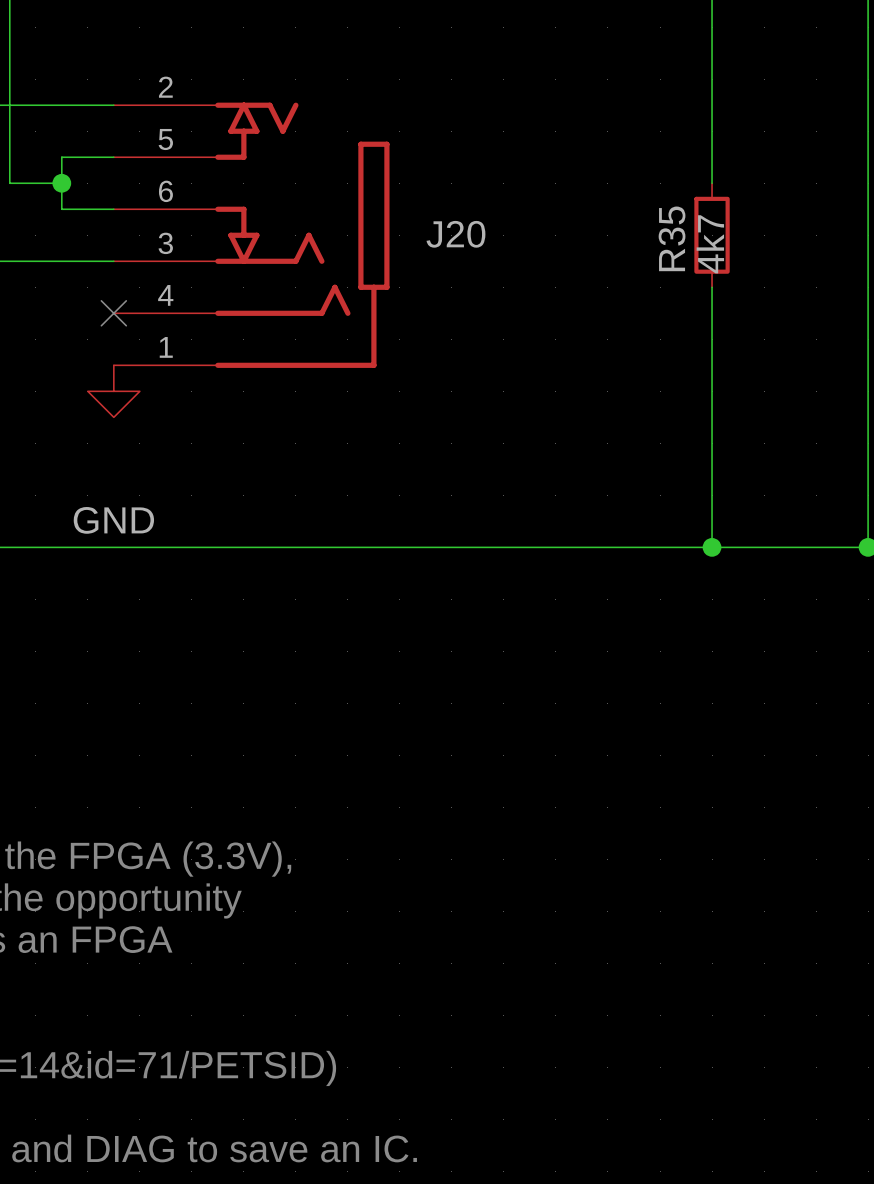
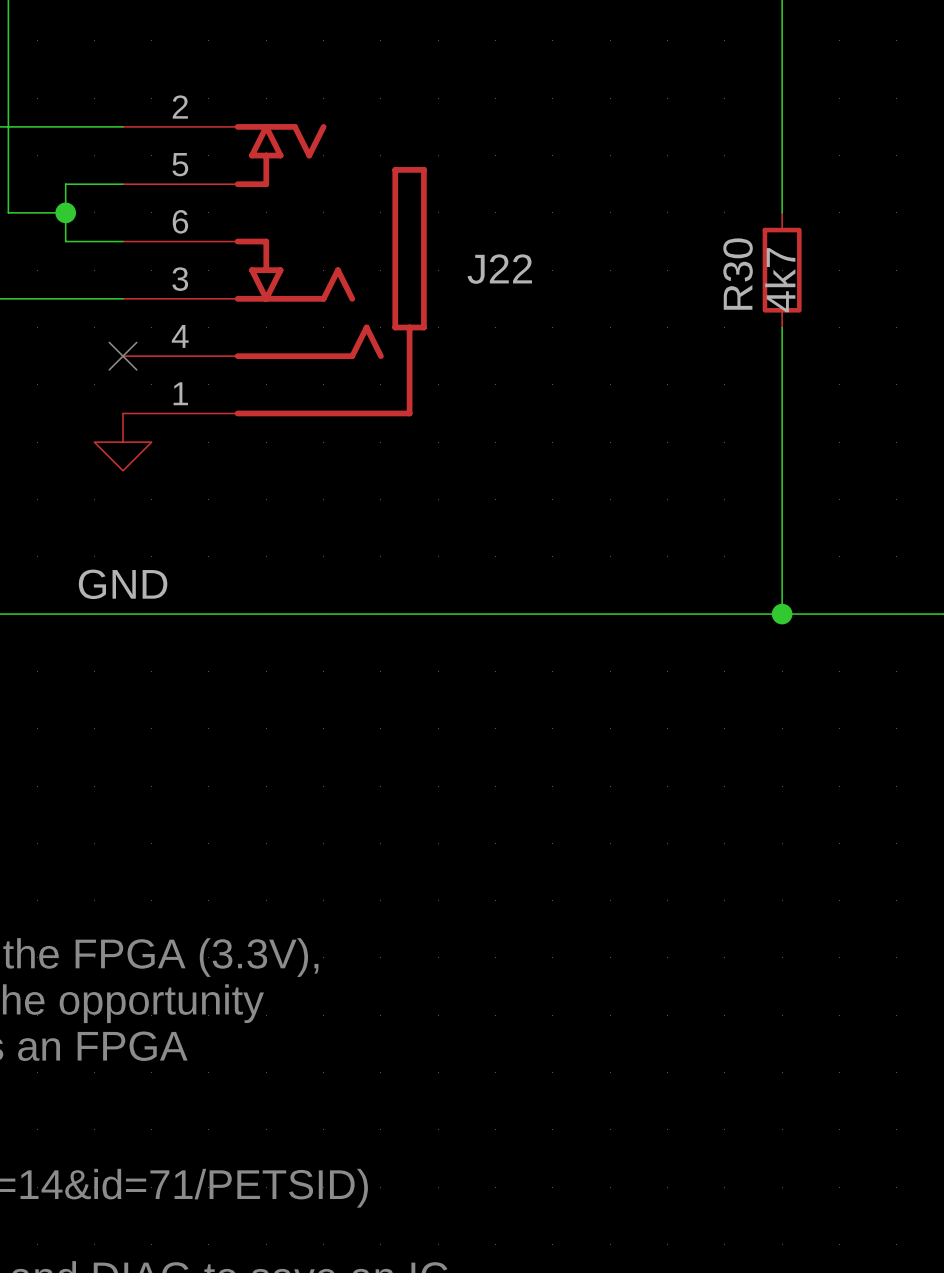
J20 name: J20 (455, 234) -> J22 (499, 269)
R35 name: R35 (672, 238) -> R30 (738, 274)

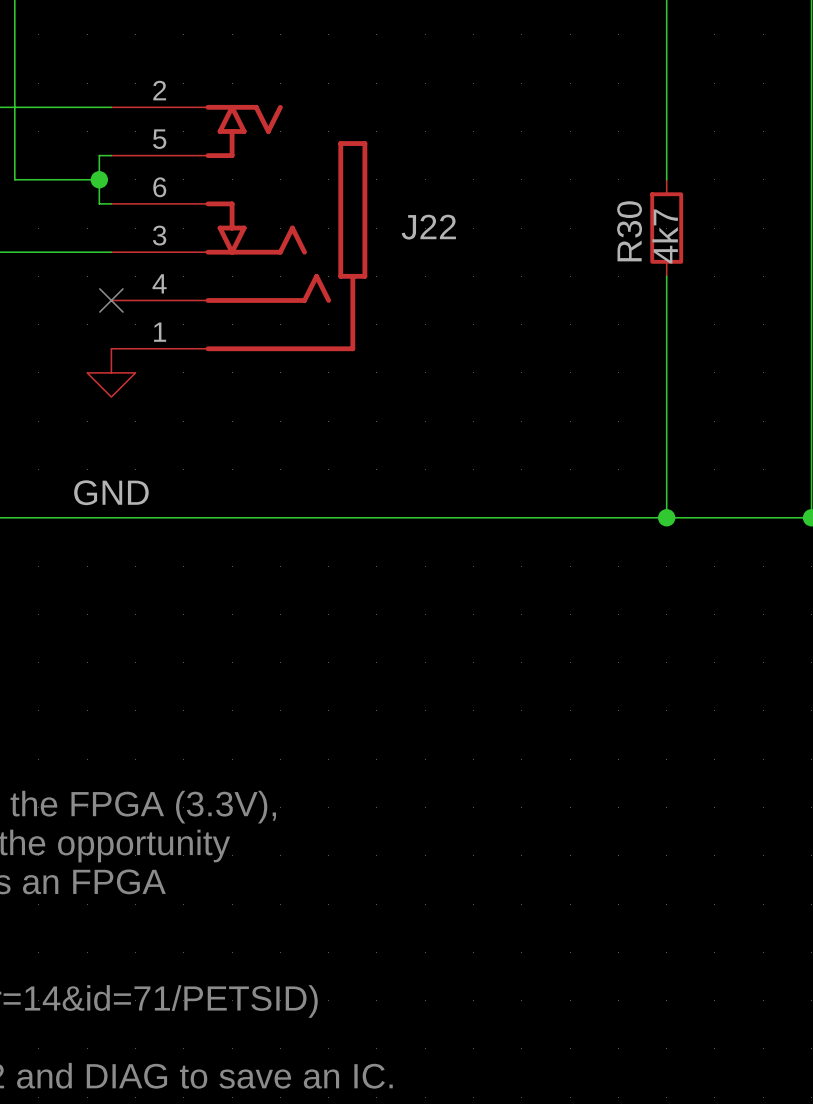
wire: (108, 184) (65, 184) (65, 241) (108, 241) -> (99, 155) (99, 203)
wire: none -> (63, 179) (99, 179)
junction position: (65, 212) -> (99, 179)

